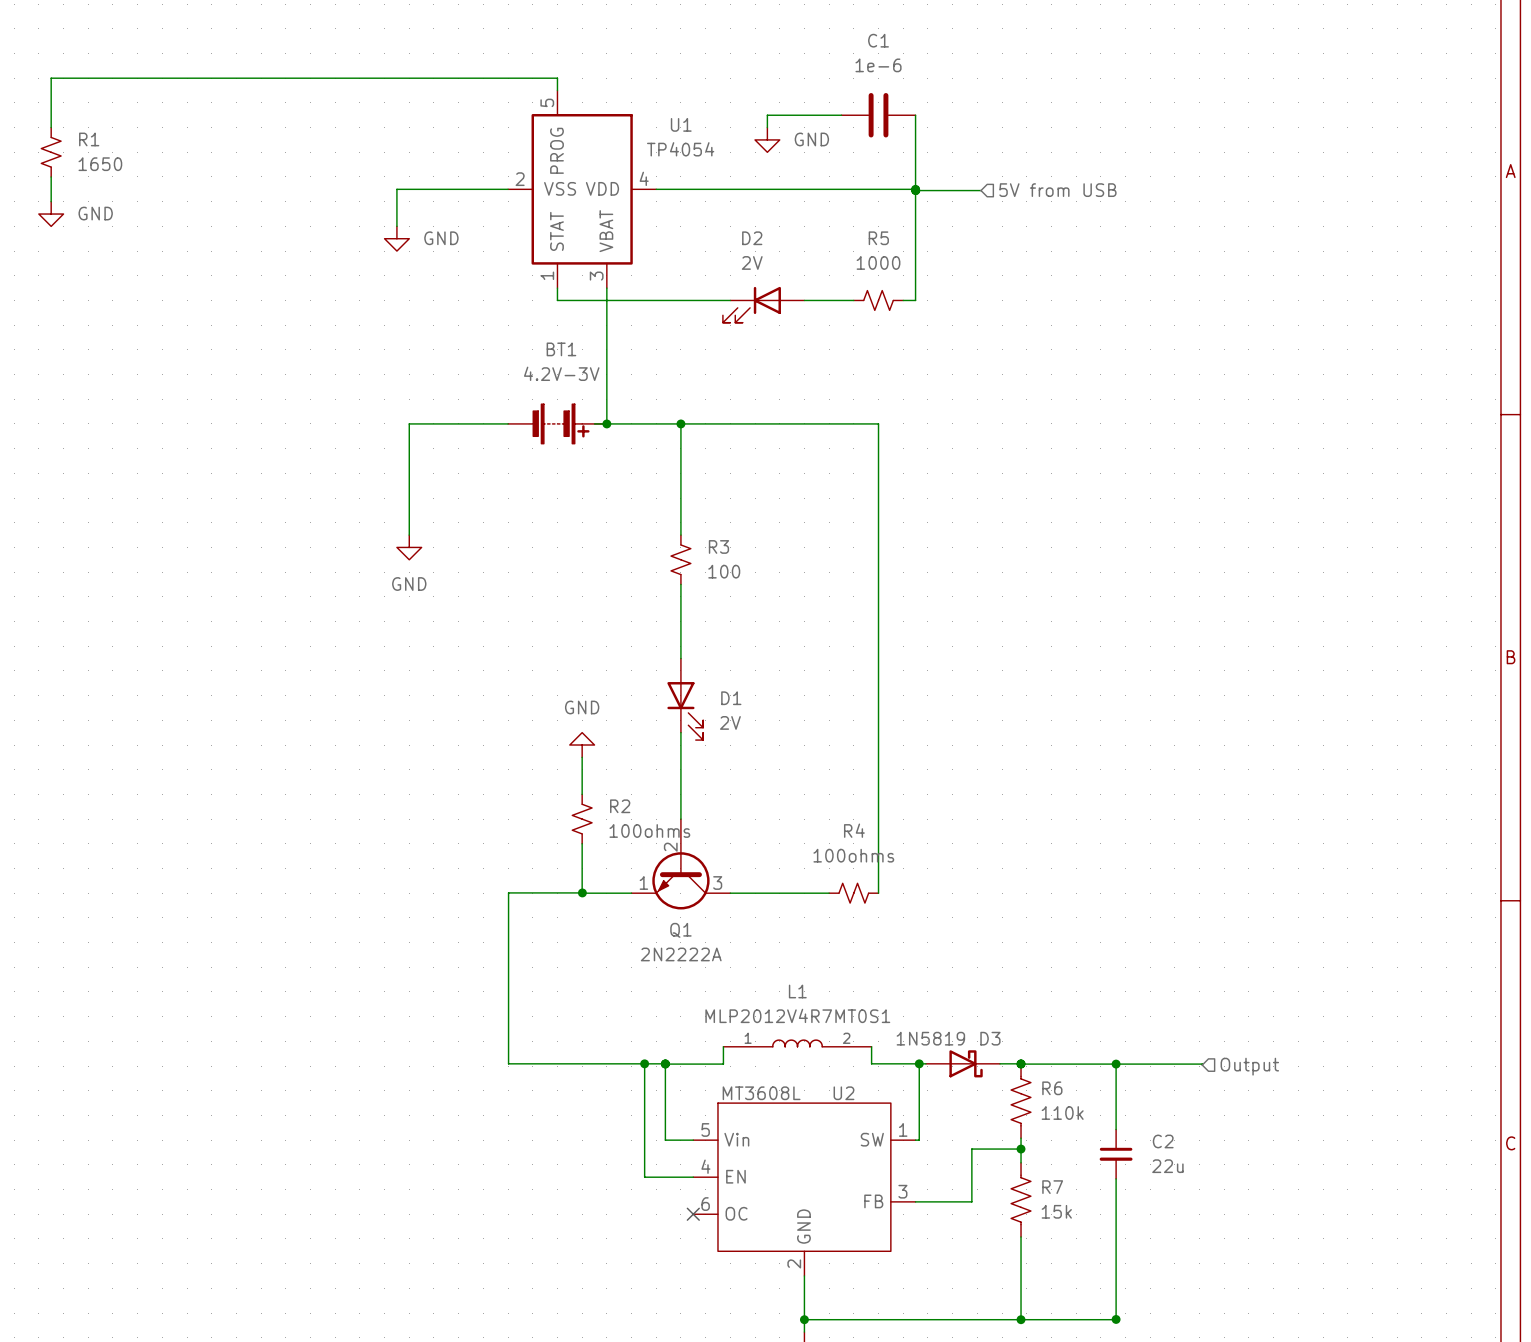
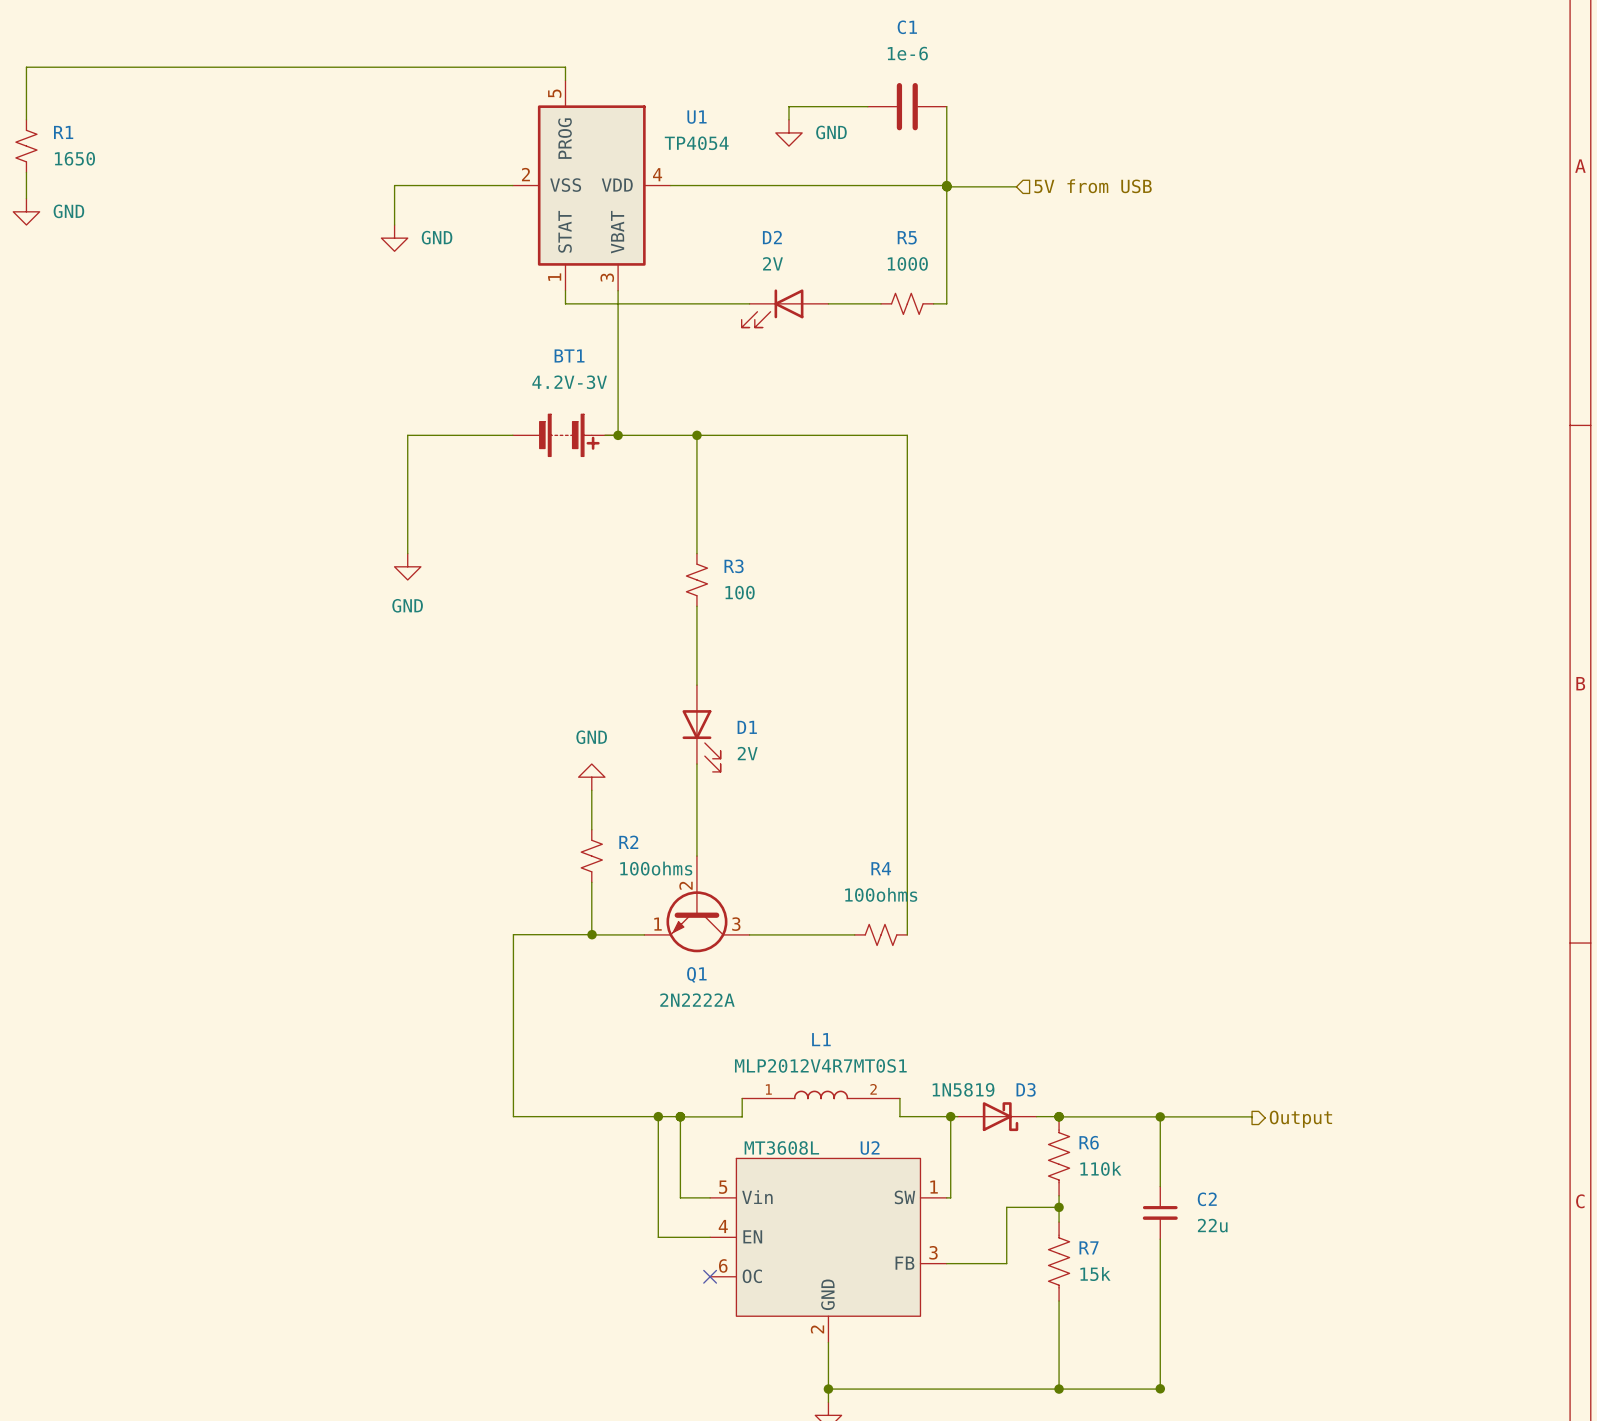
hierarchical label shape: input (1249, 1066) -> output (1300, 1119)

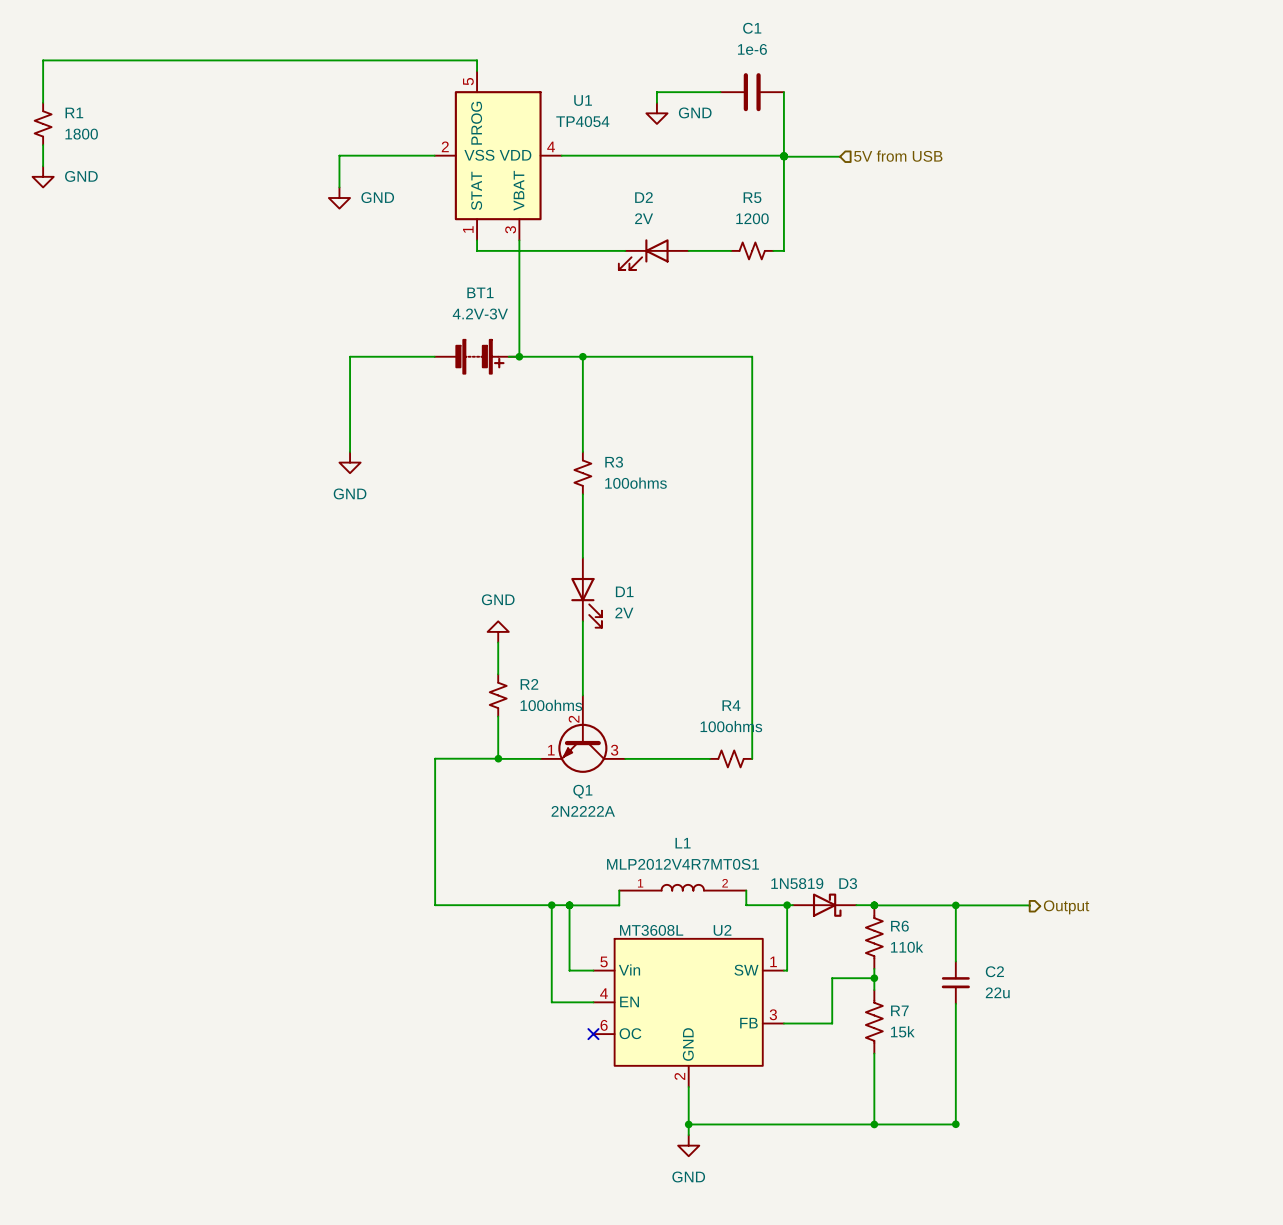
R1 value: 1650 (74, 158) -> 1800 (81, 134)
R5 value: 1000 (907, 263) -> 1200 (752, 218)
R3 value: 100 (740, 592) -> 100ohms (635, 483)

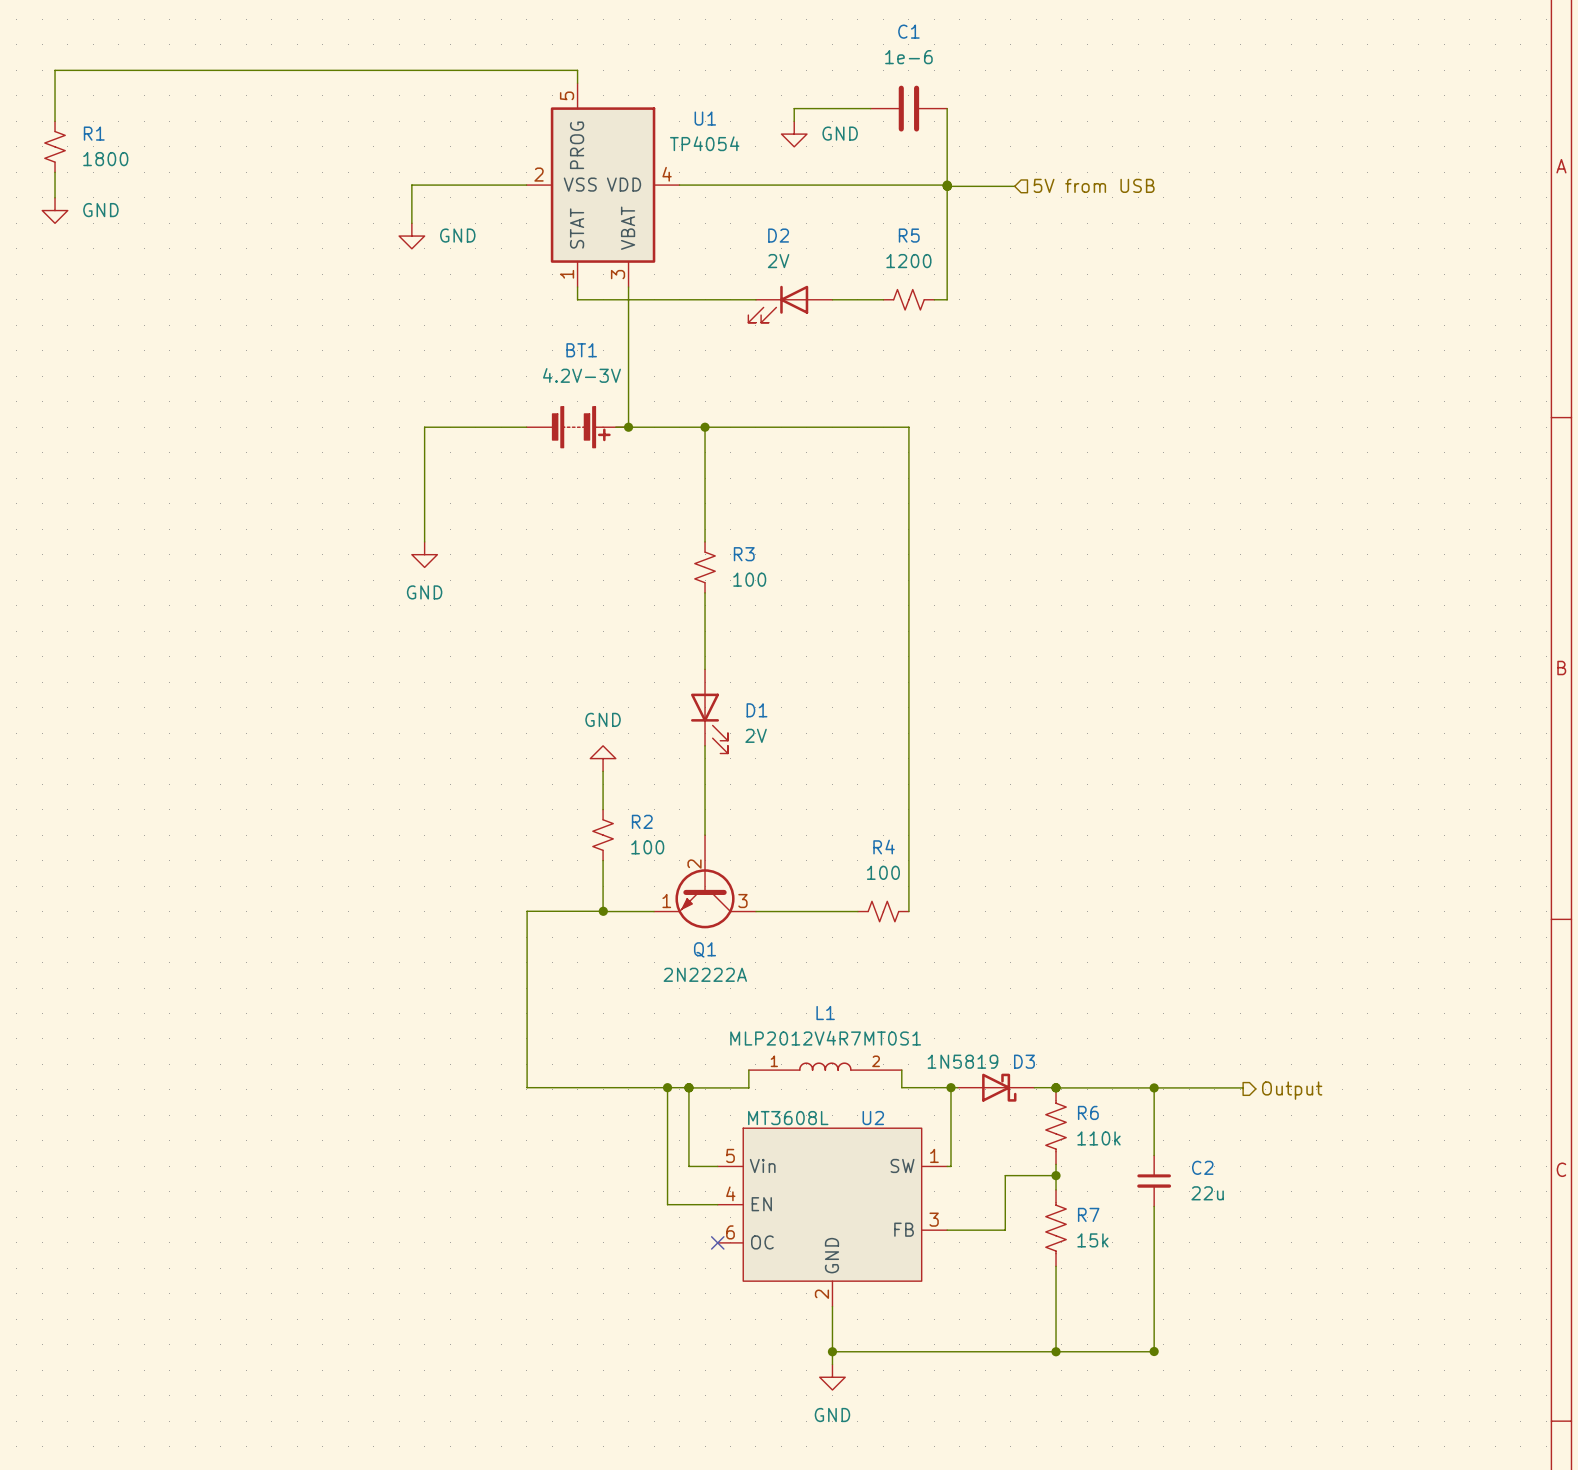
R3 value: 100ohms (635, 483) -> 100 (749, 579)
R2 value: 100ohms (551, 705) -> 100 (647, 847)
R4 value: 100ohms (731, 726) -> 100 (883, 872)

